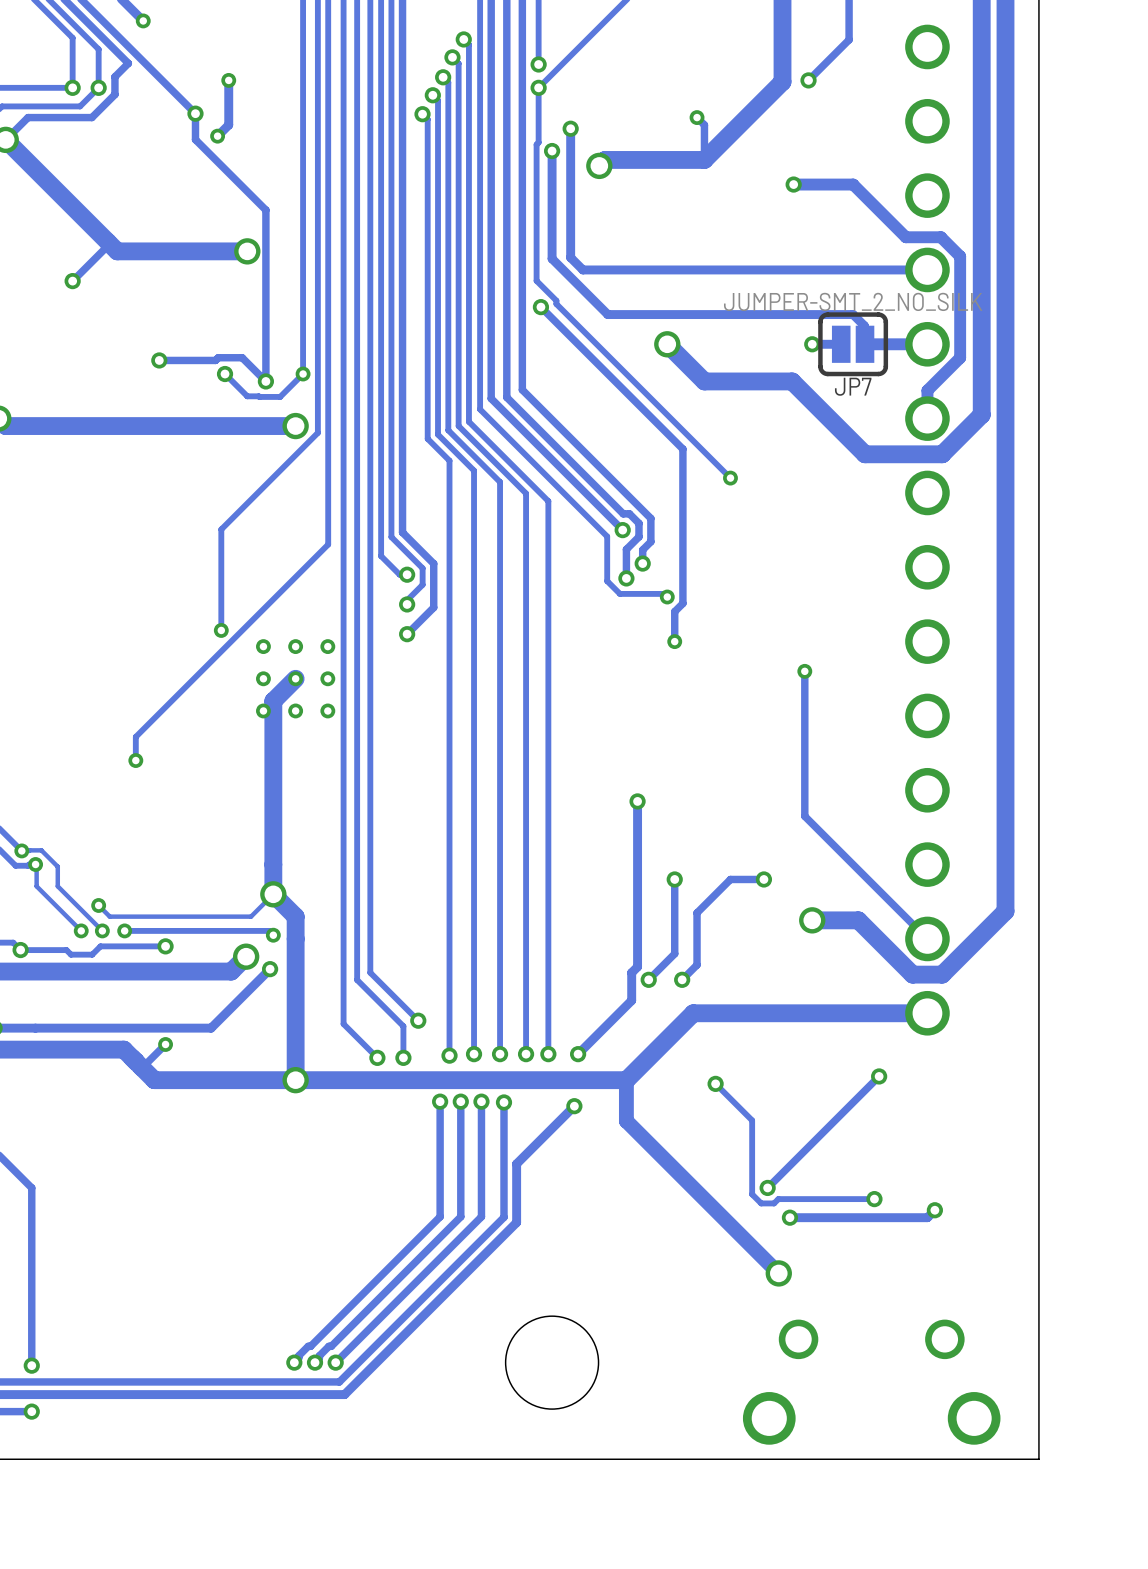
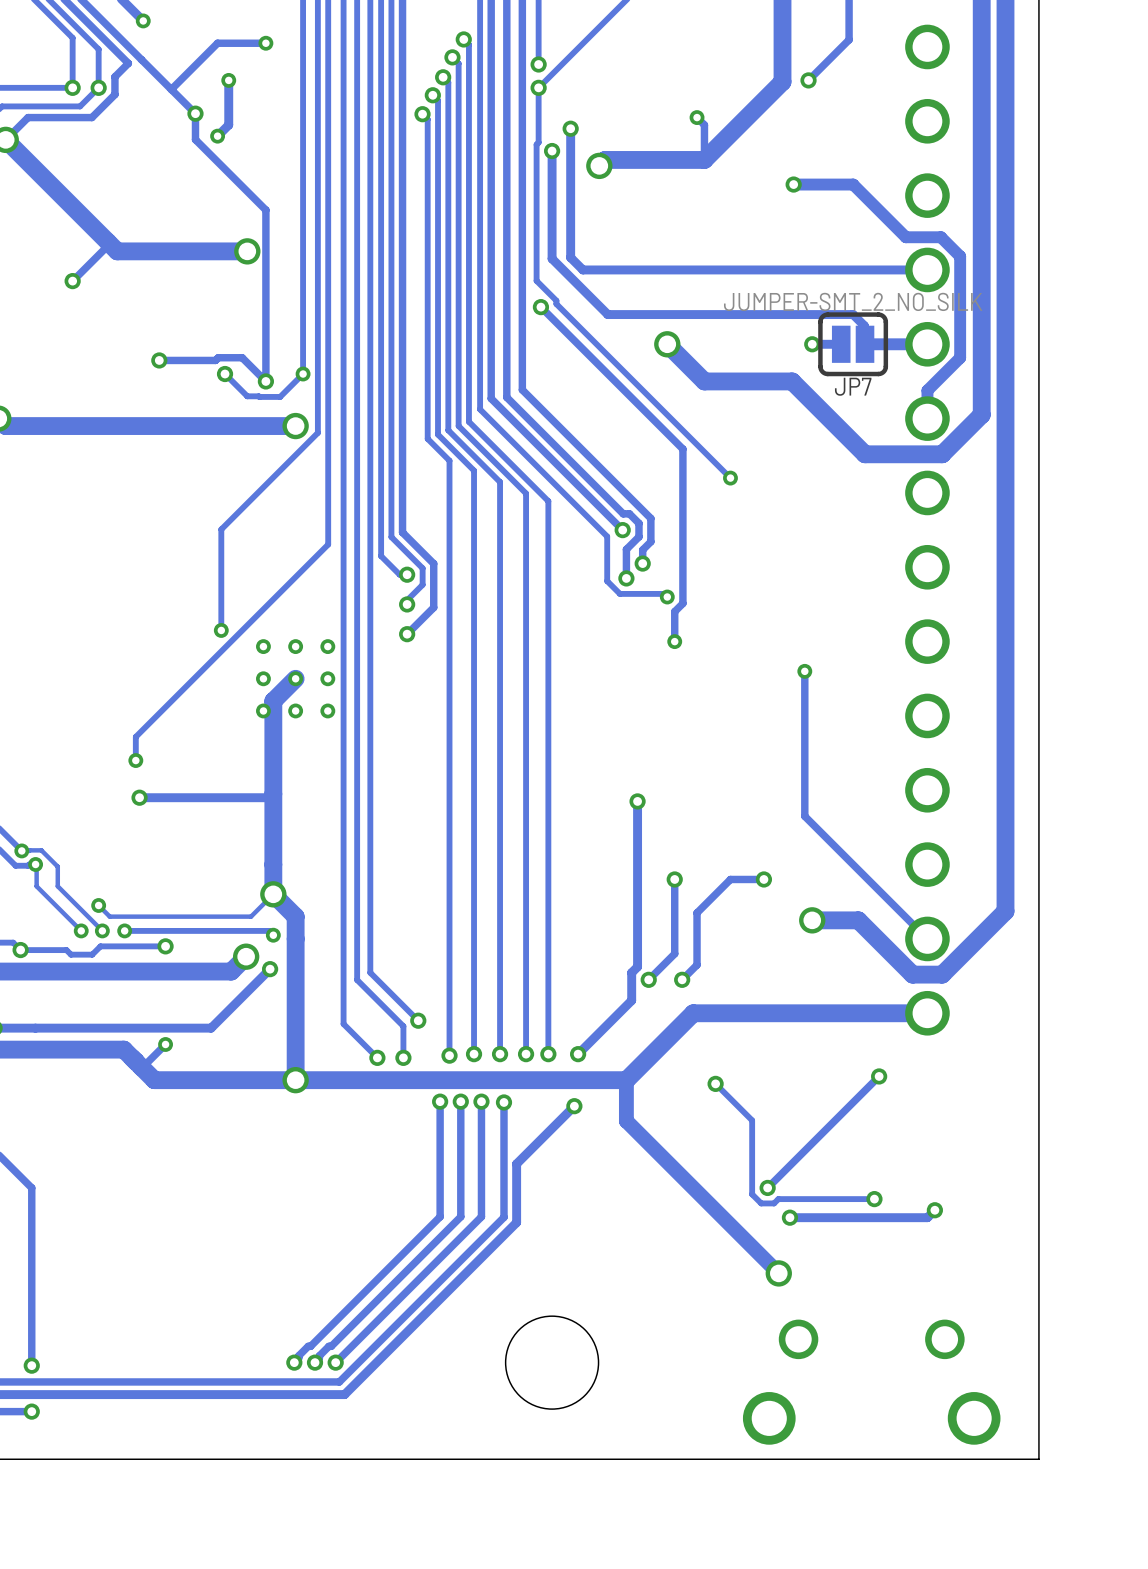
track: none -> (265, 43) (217, 43) (171, 89)
via: none -> (265, 43)
track: none -> (273, 793) (269, 797) (139, 797)
via: none -> (139, 797)

